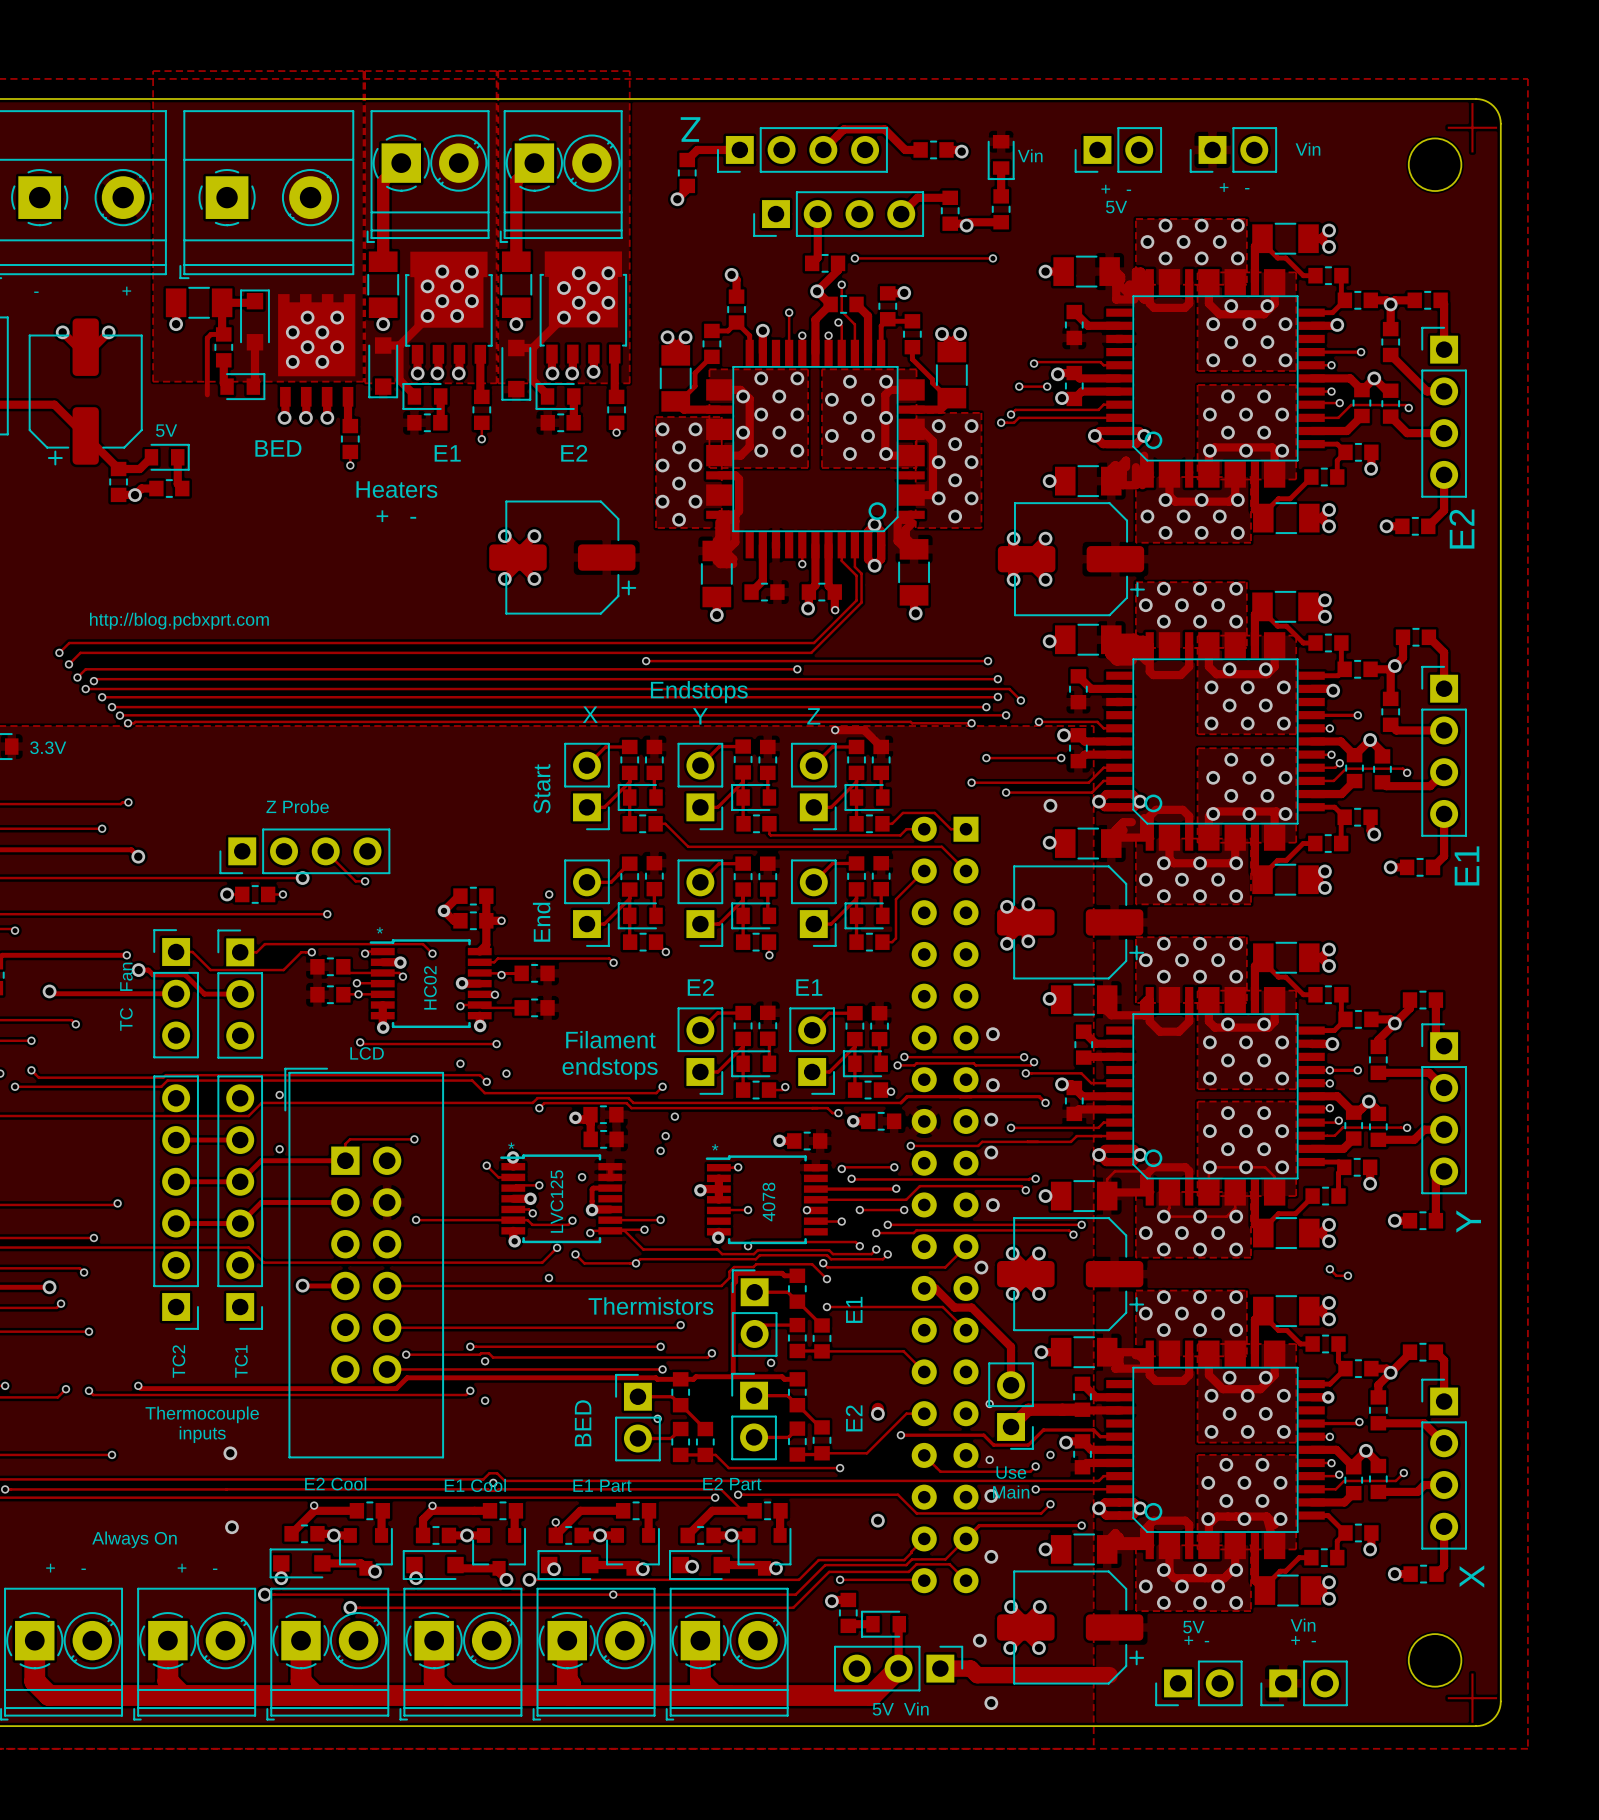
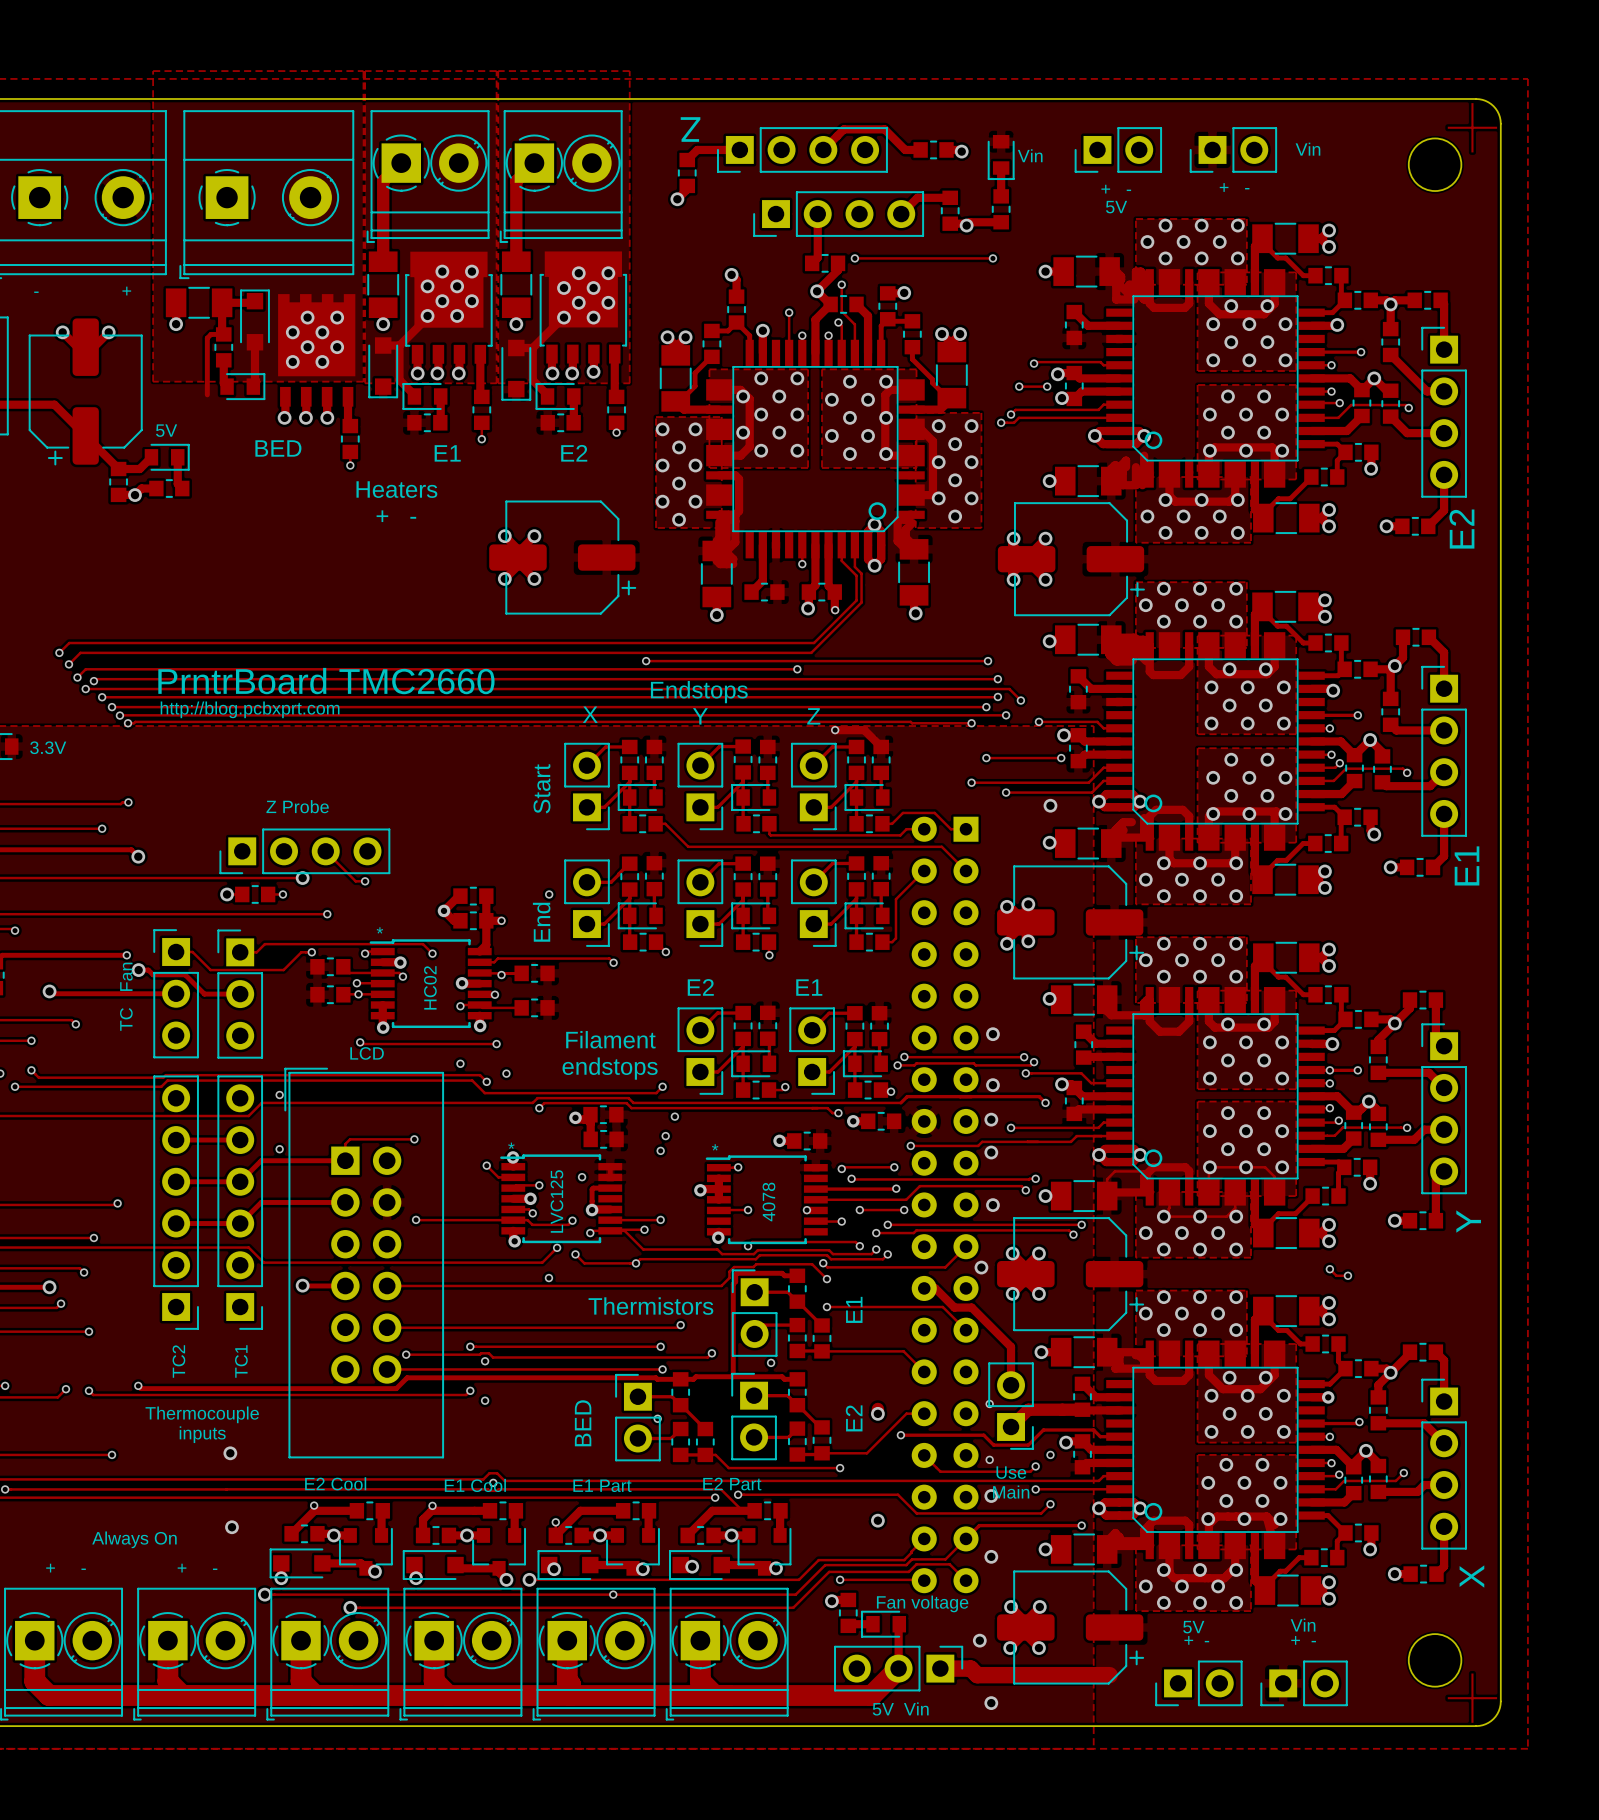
text position: http://blog.pcbxprt.com (179, 621) -> http://blog.pcbxprt.com (250, 709)
text: none -> PrntrBoard TMC2660 (326, 681)
text: none -> Fan voltage (922, 1603)

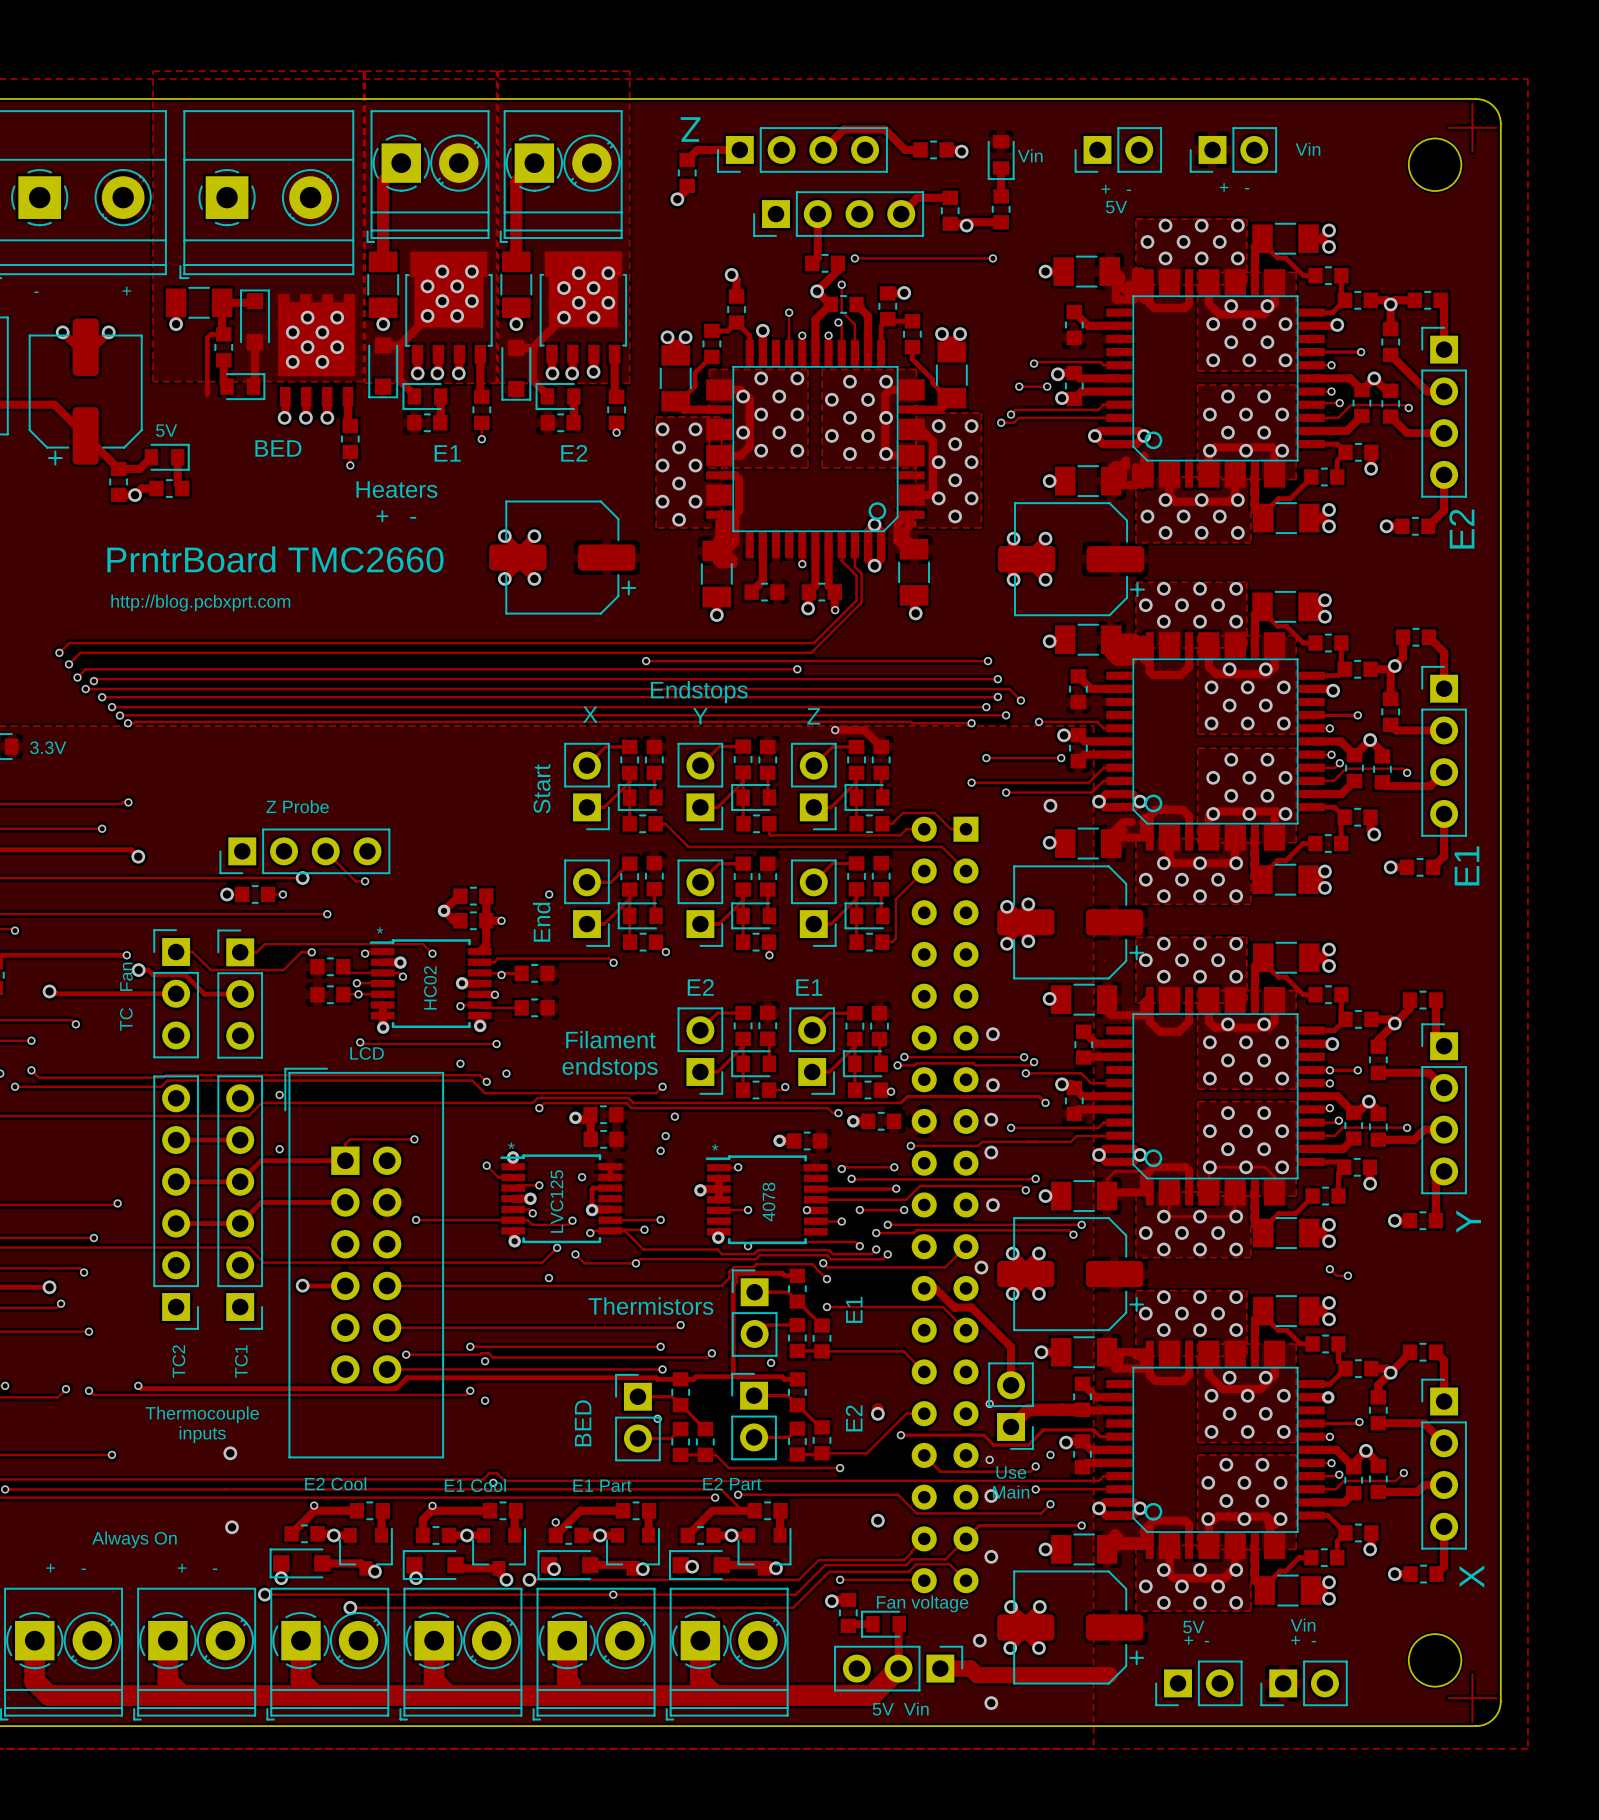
text position: PrntrBoard TMC2660 (326, 681) -> PrntrBoard TMC2660 (275, 559)
text position: http://blog.pcbxprt.com (250, 709) -> http://blog.pcbxprt.com (200, 602)

